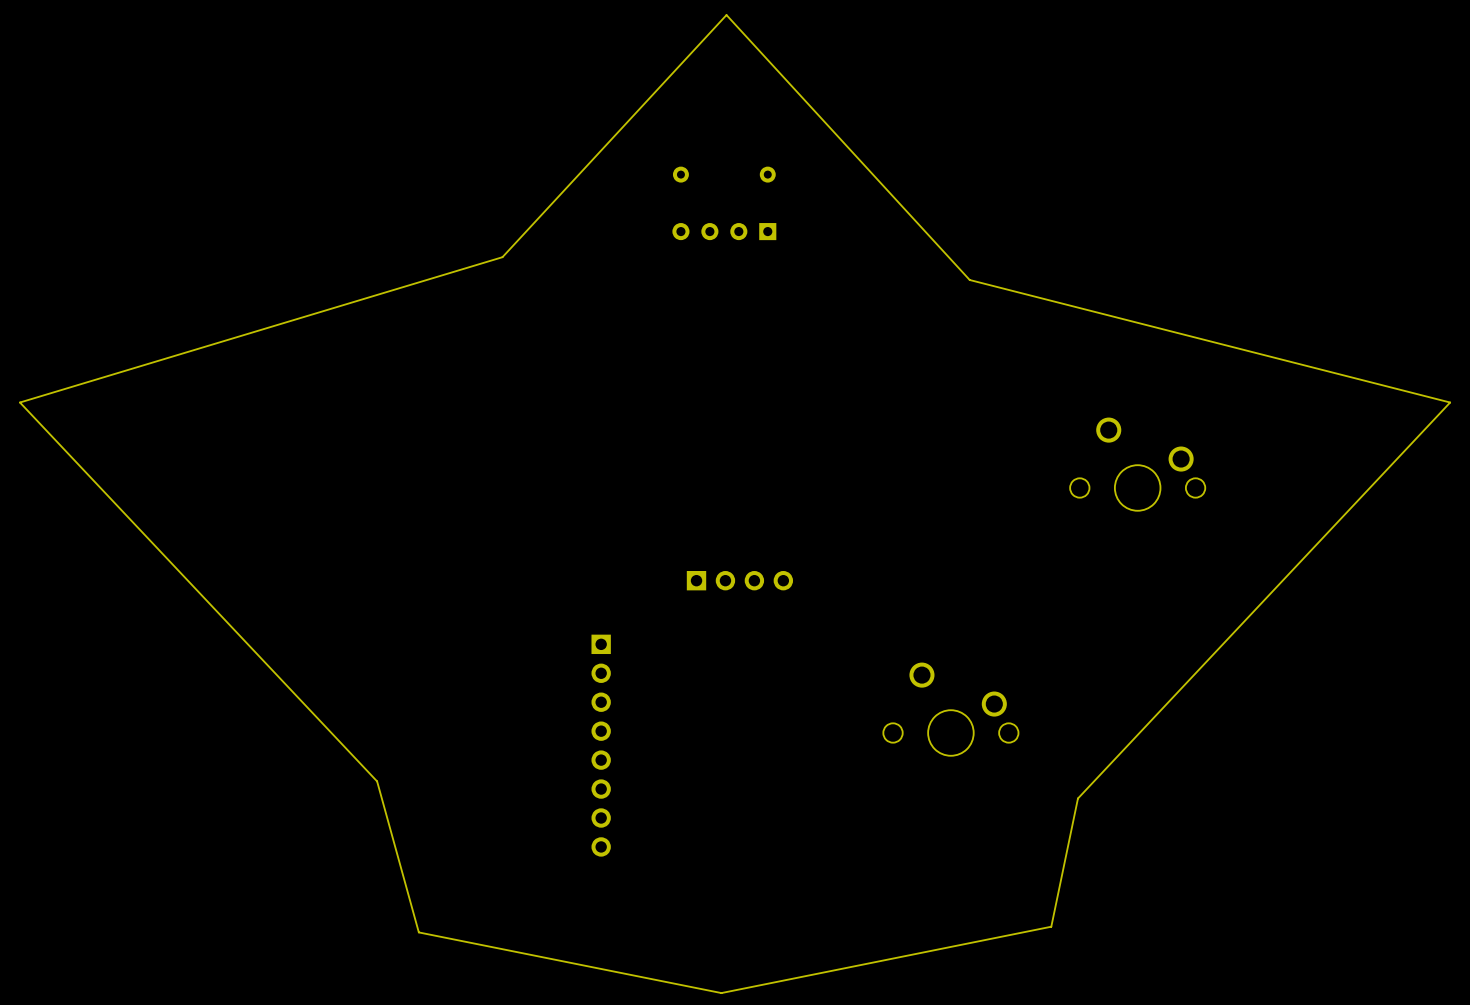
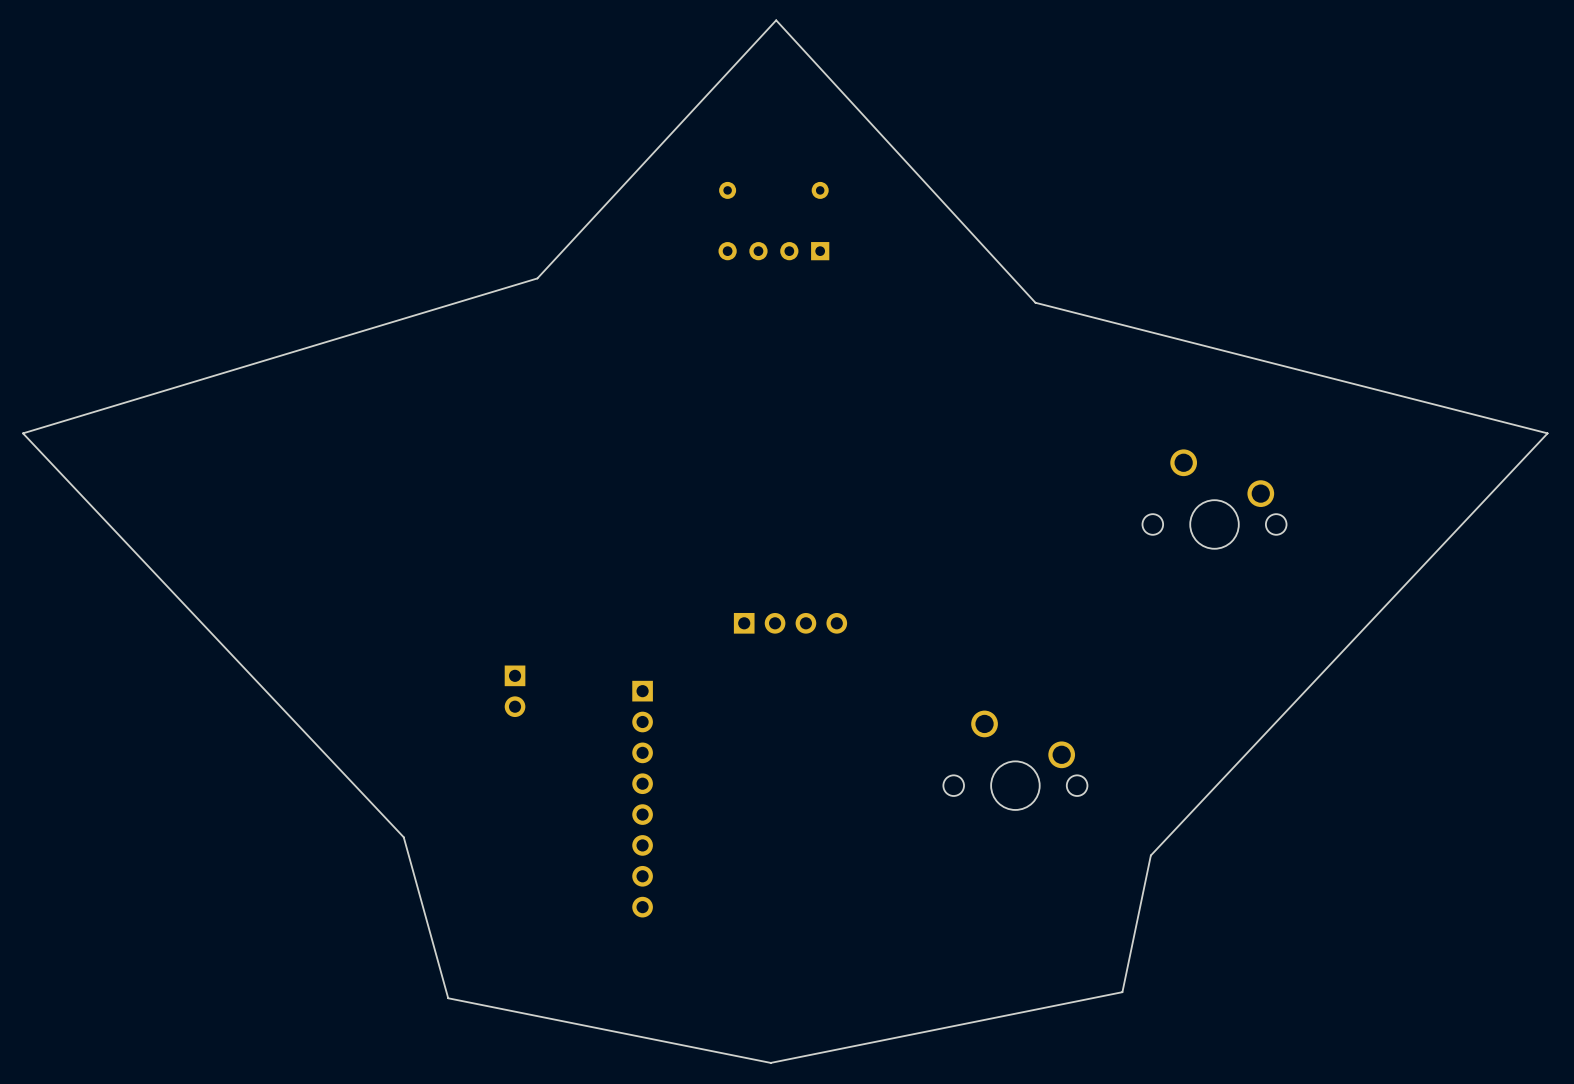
part: none -> (515, 691)

